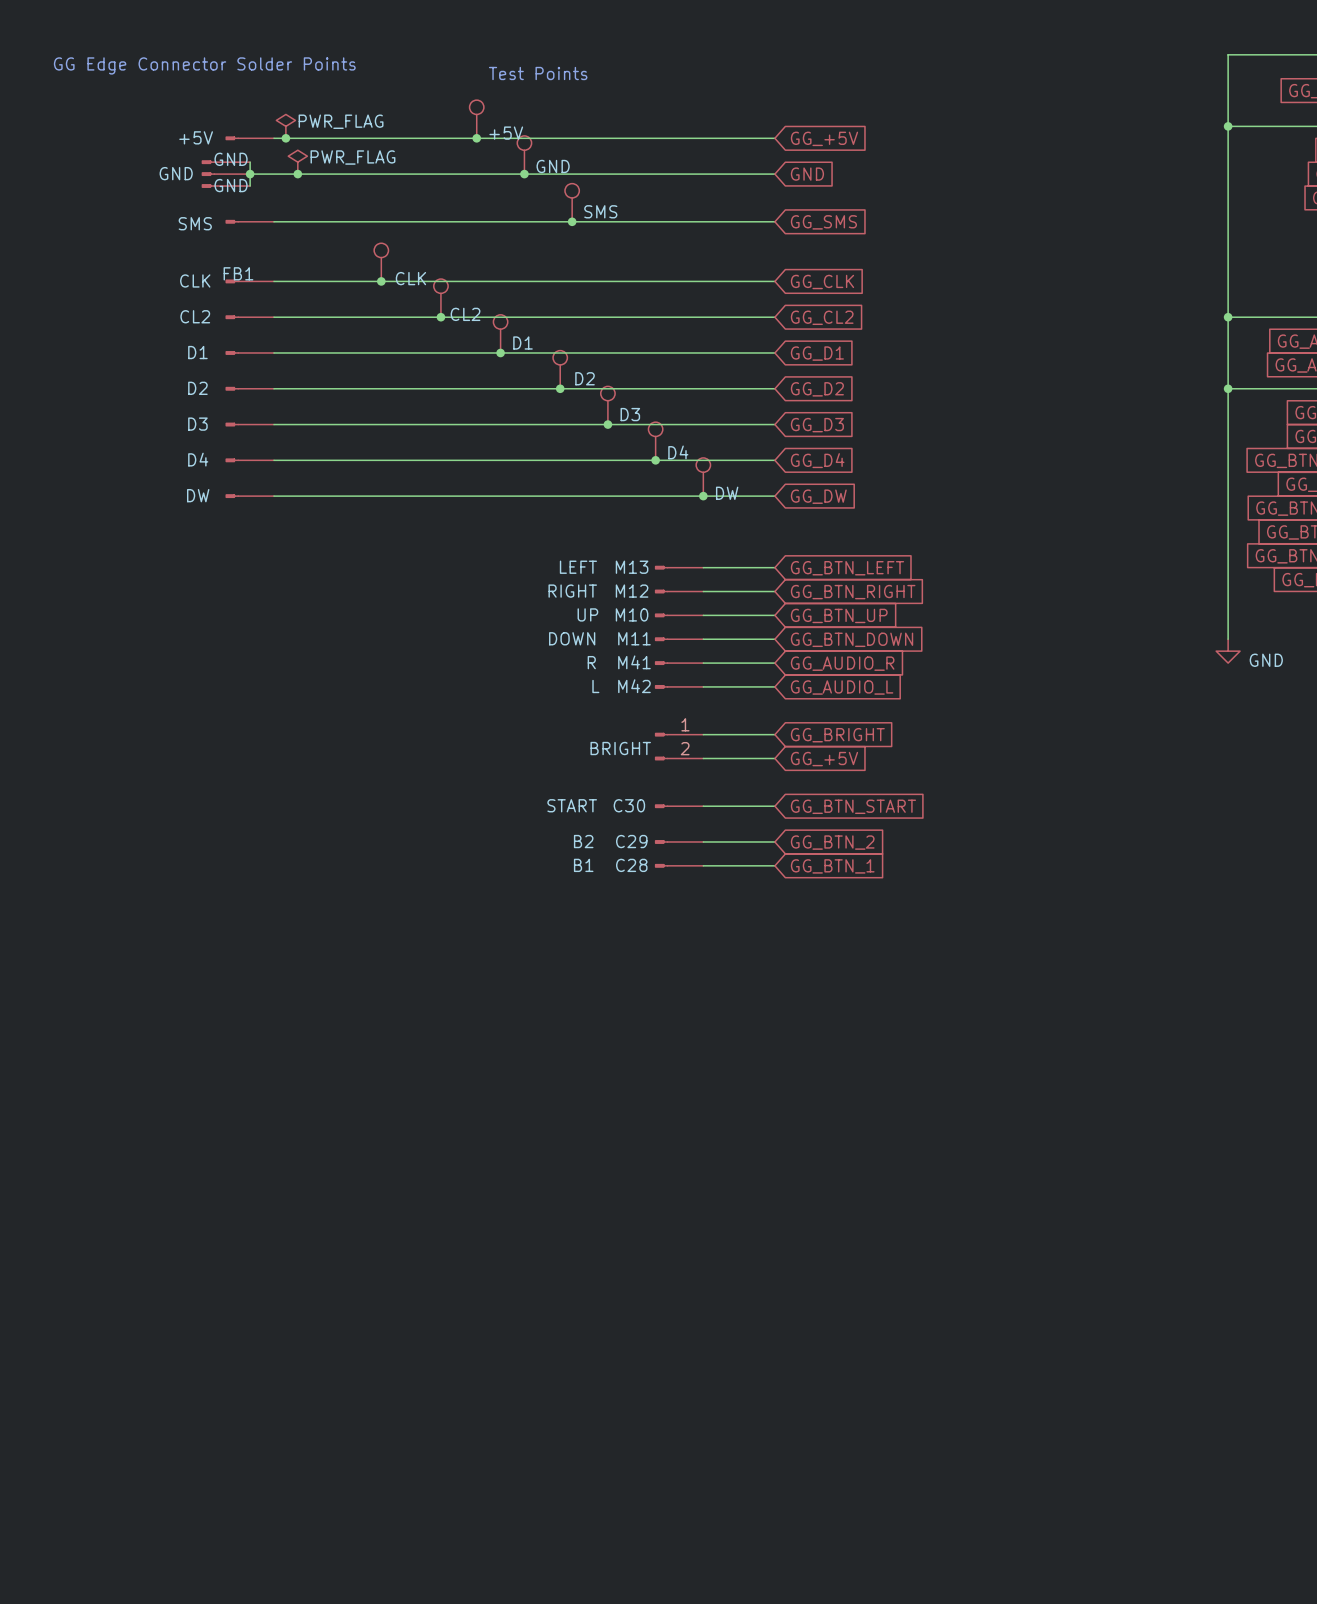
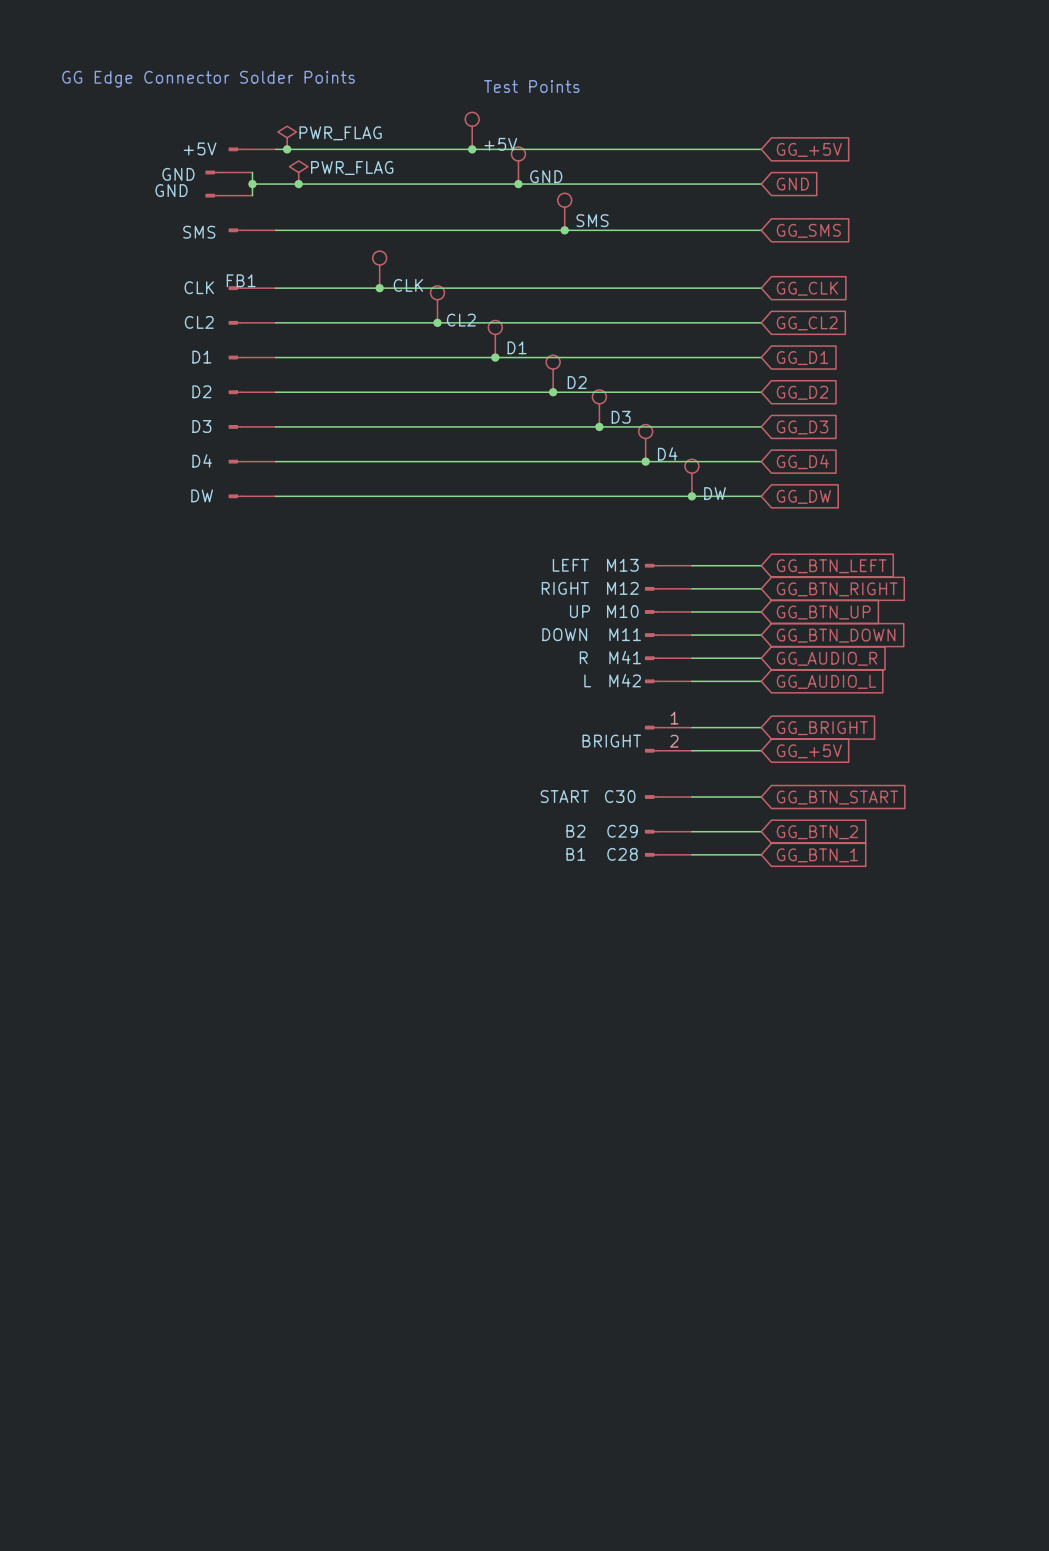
part value position: GND (231, 159) -> GND (178, 174)
part: GND (225, 174) -> none
part value position: GND (231, 185) -> GND (171, 190)

